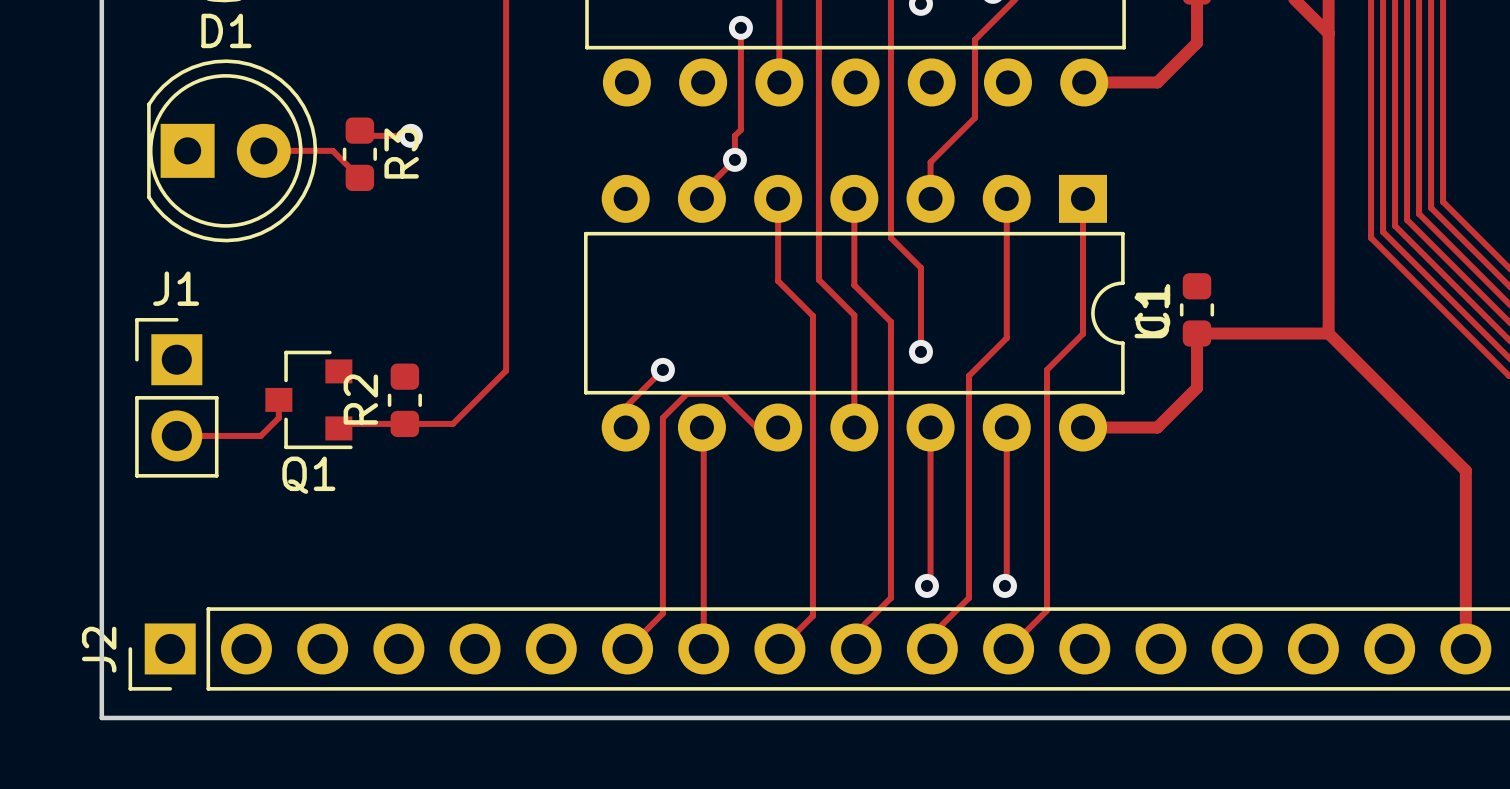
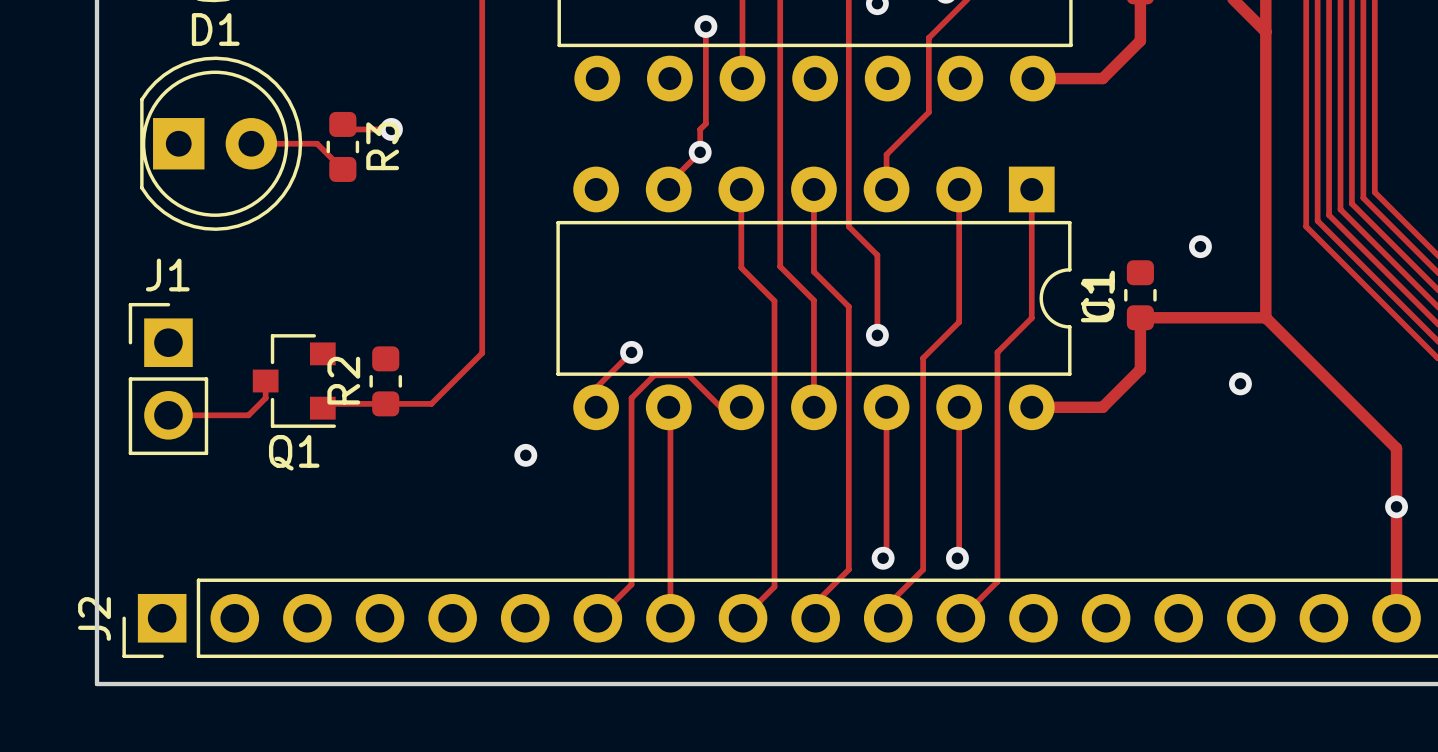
via: none -> (1200, 246)
via: none -> (1240, 383)
via: none -> (525, 455)
via: none -> (1396, 506)

